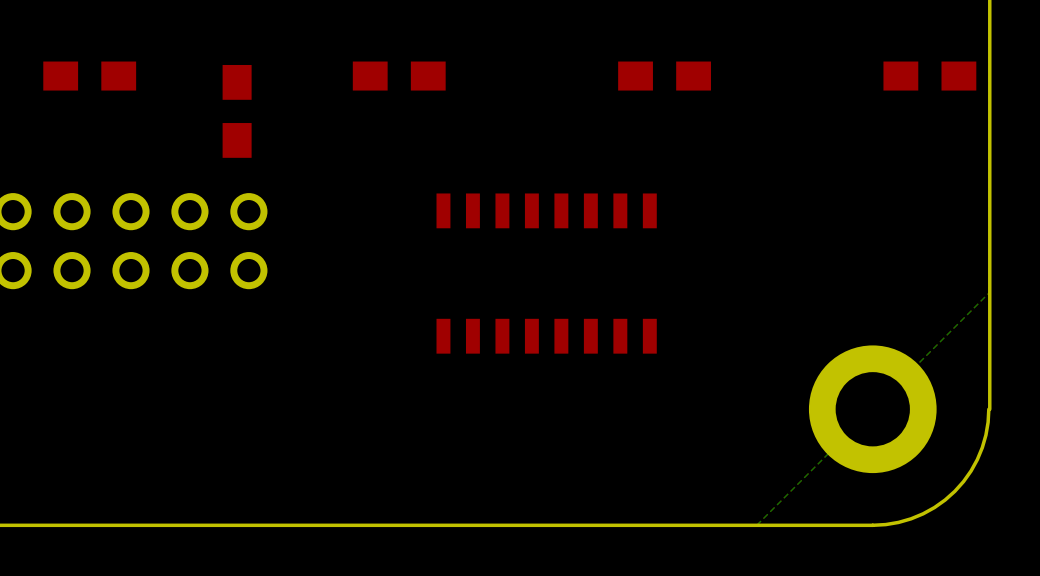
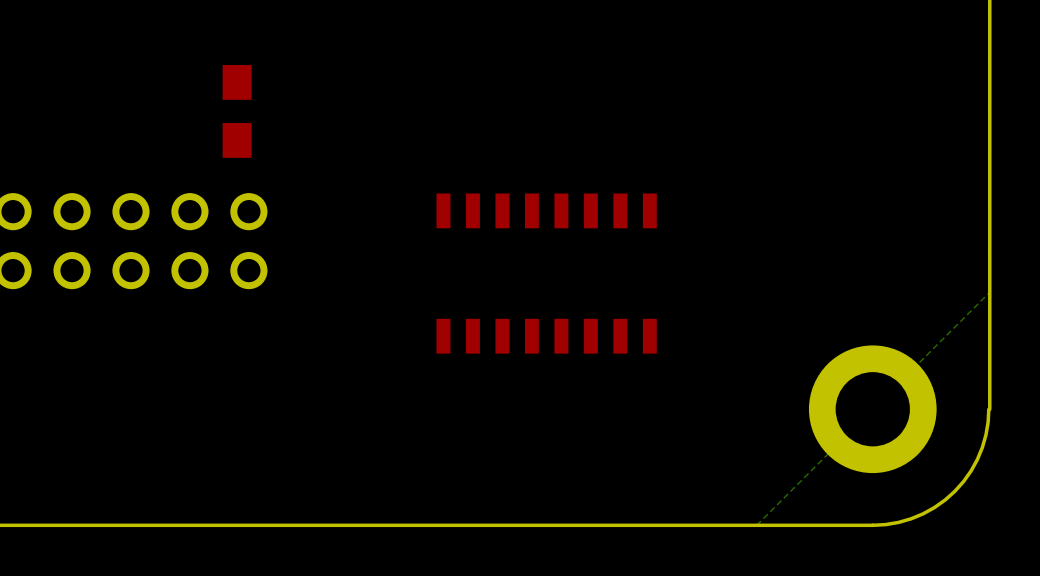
part: (89, 76) -> none
part: (399, 76) -> none
part: (664, 76) -> none
part: (929, 76) -> none

